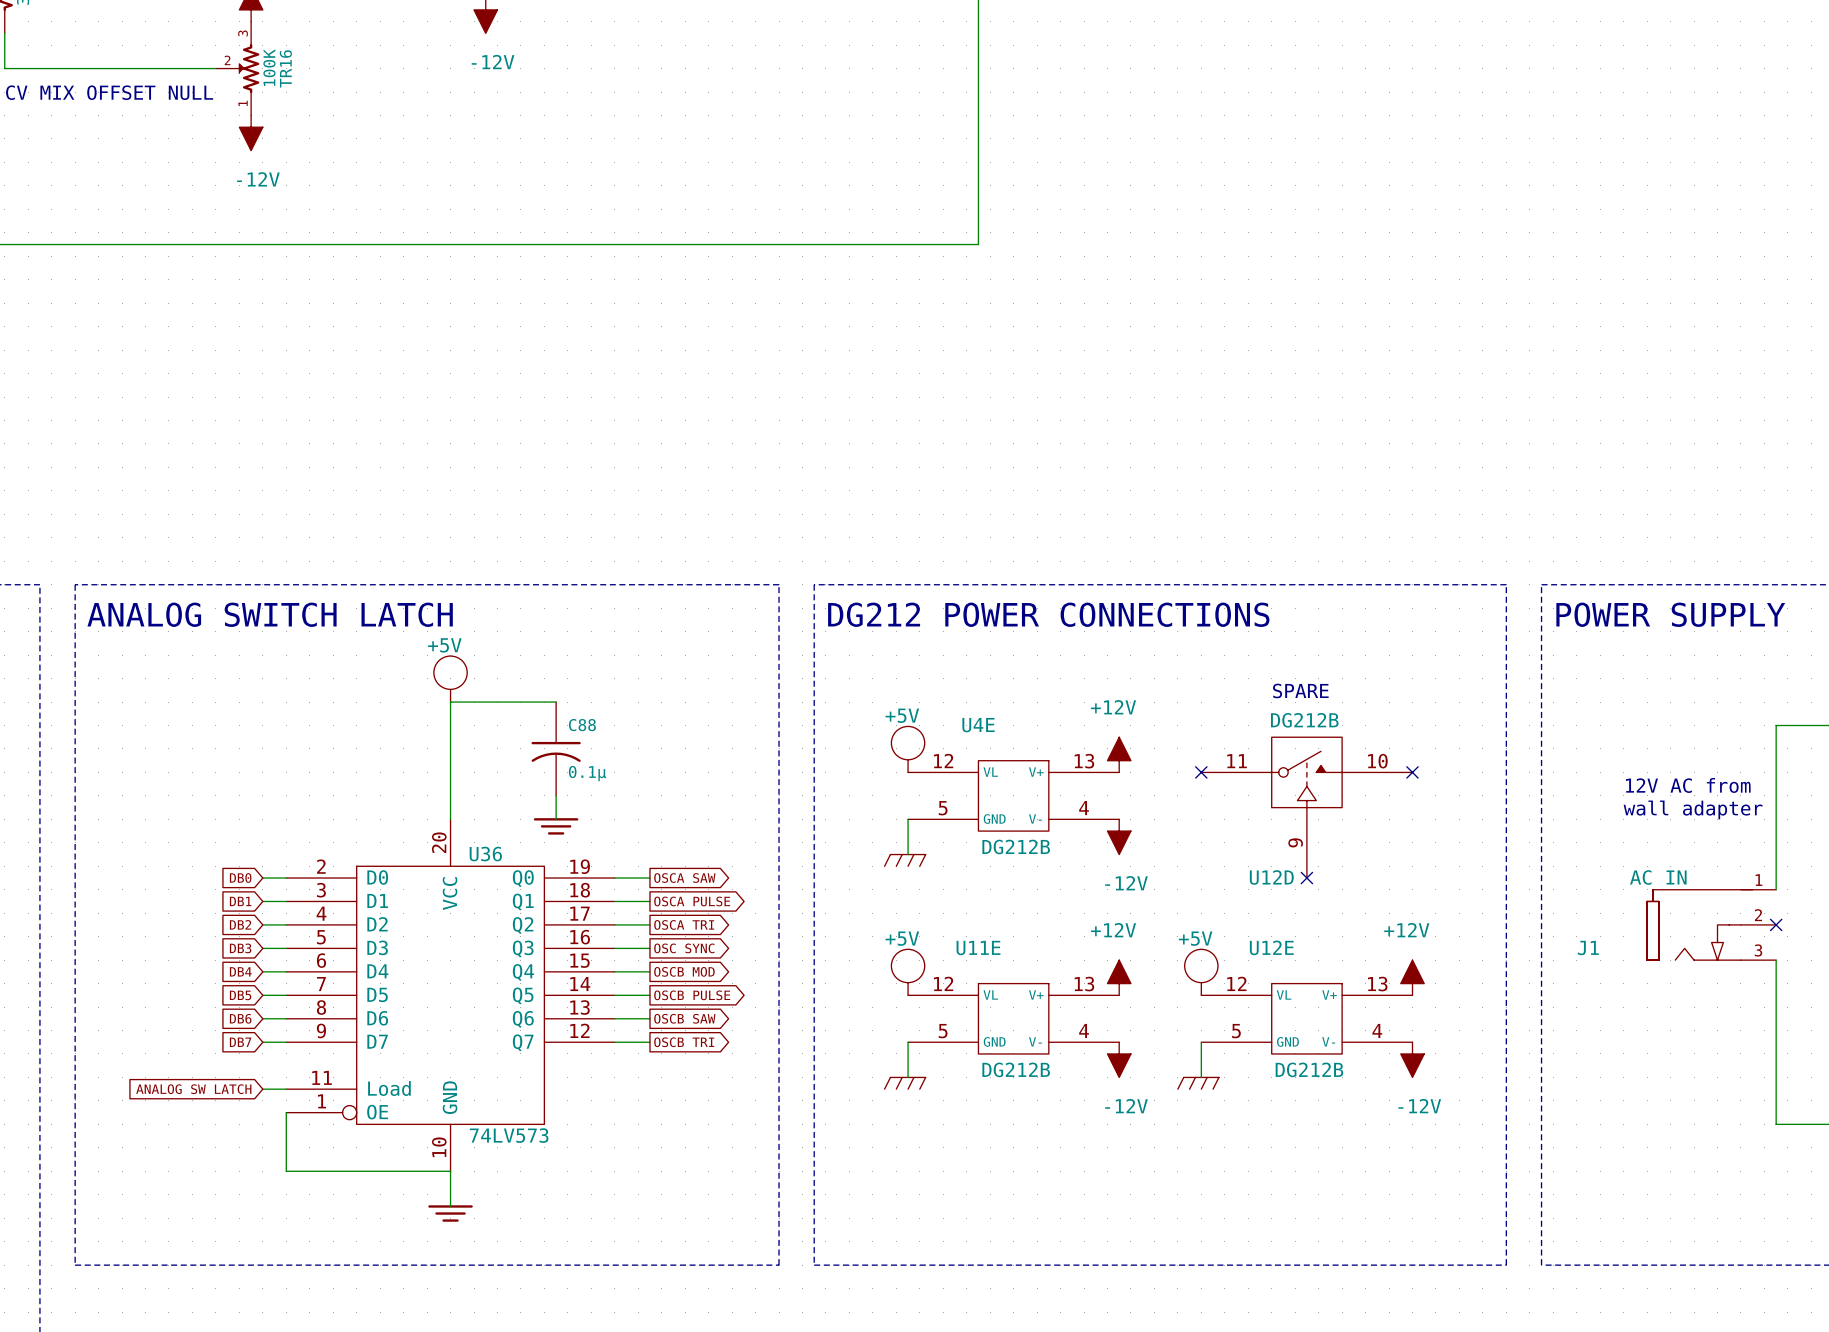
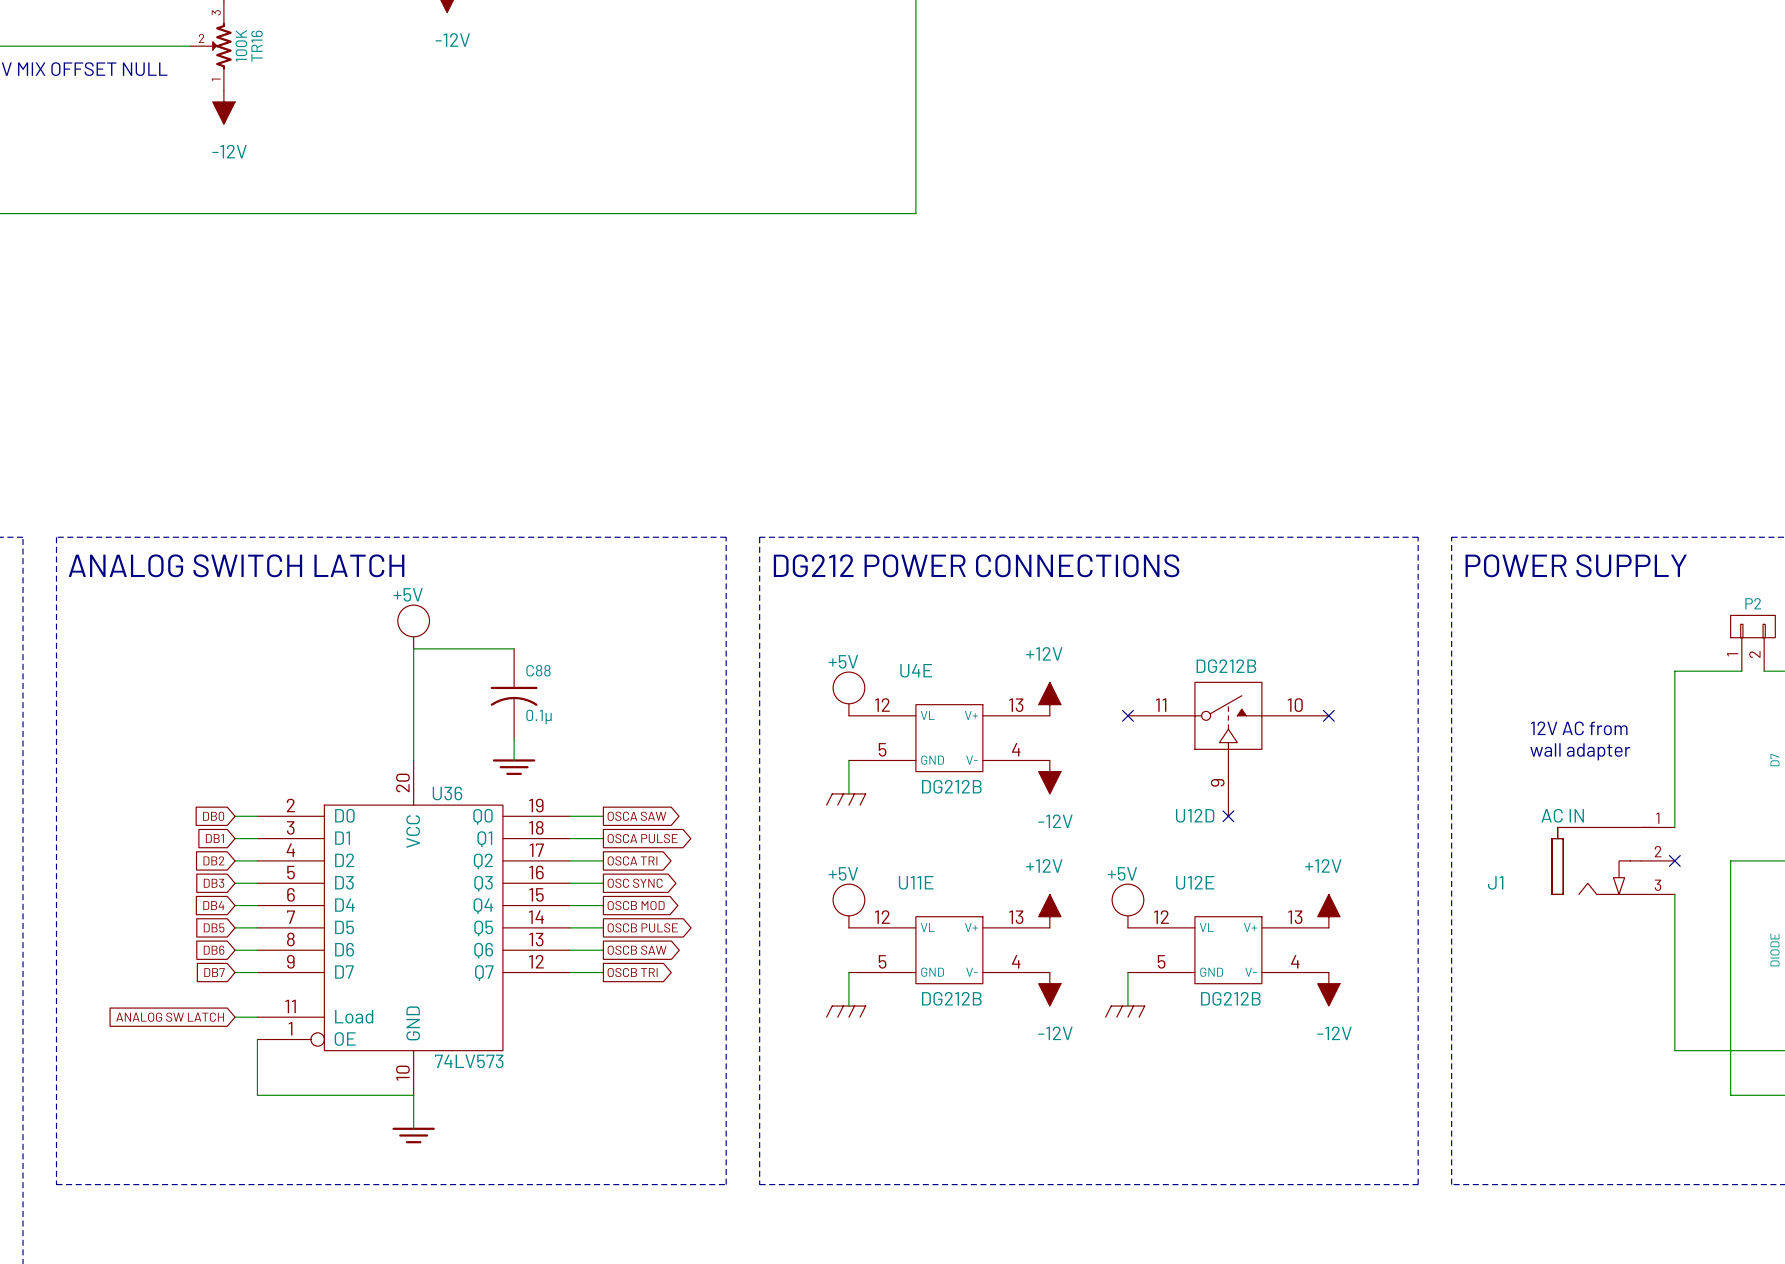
text: SPARE (1300, 690) -> none

